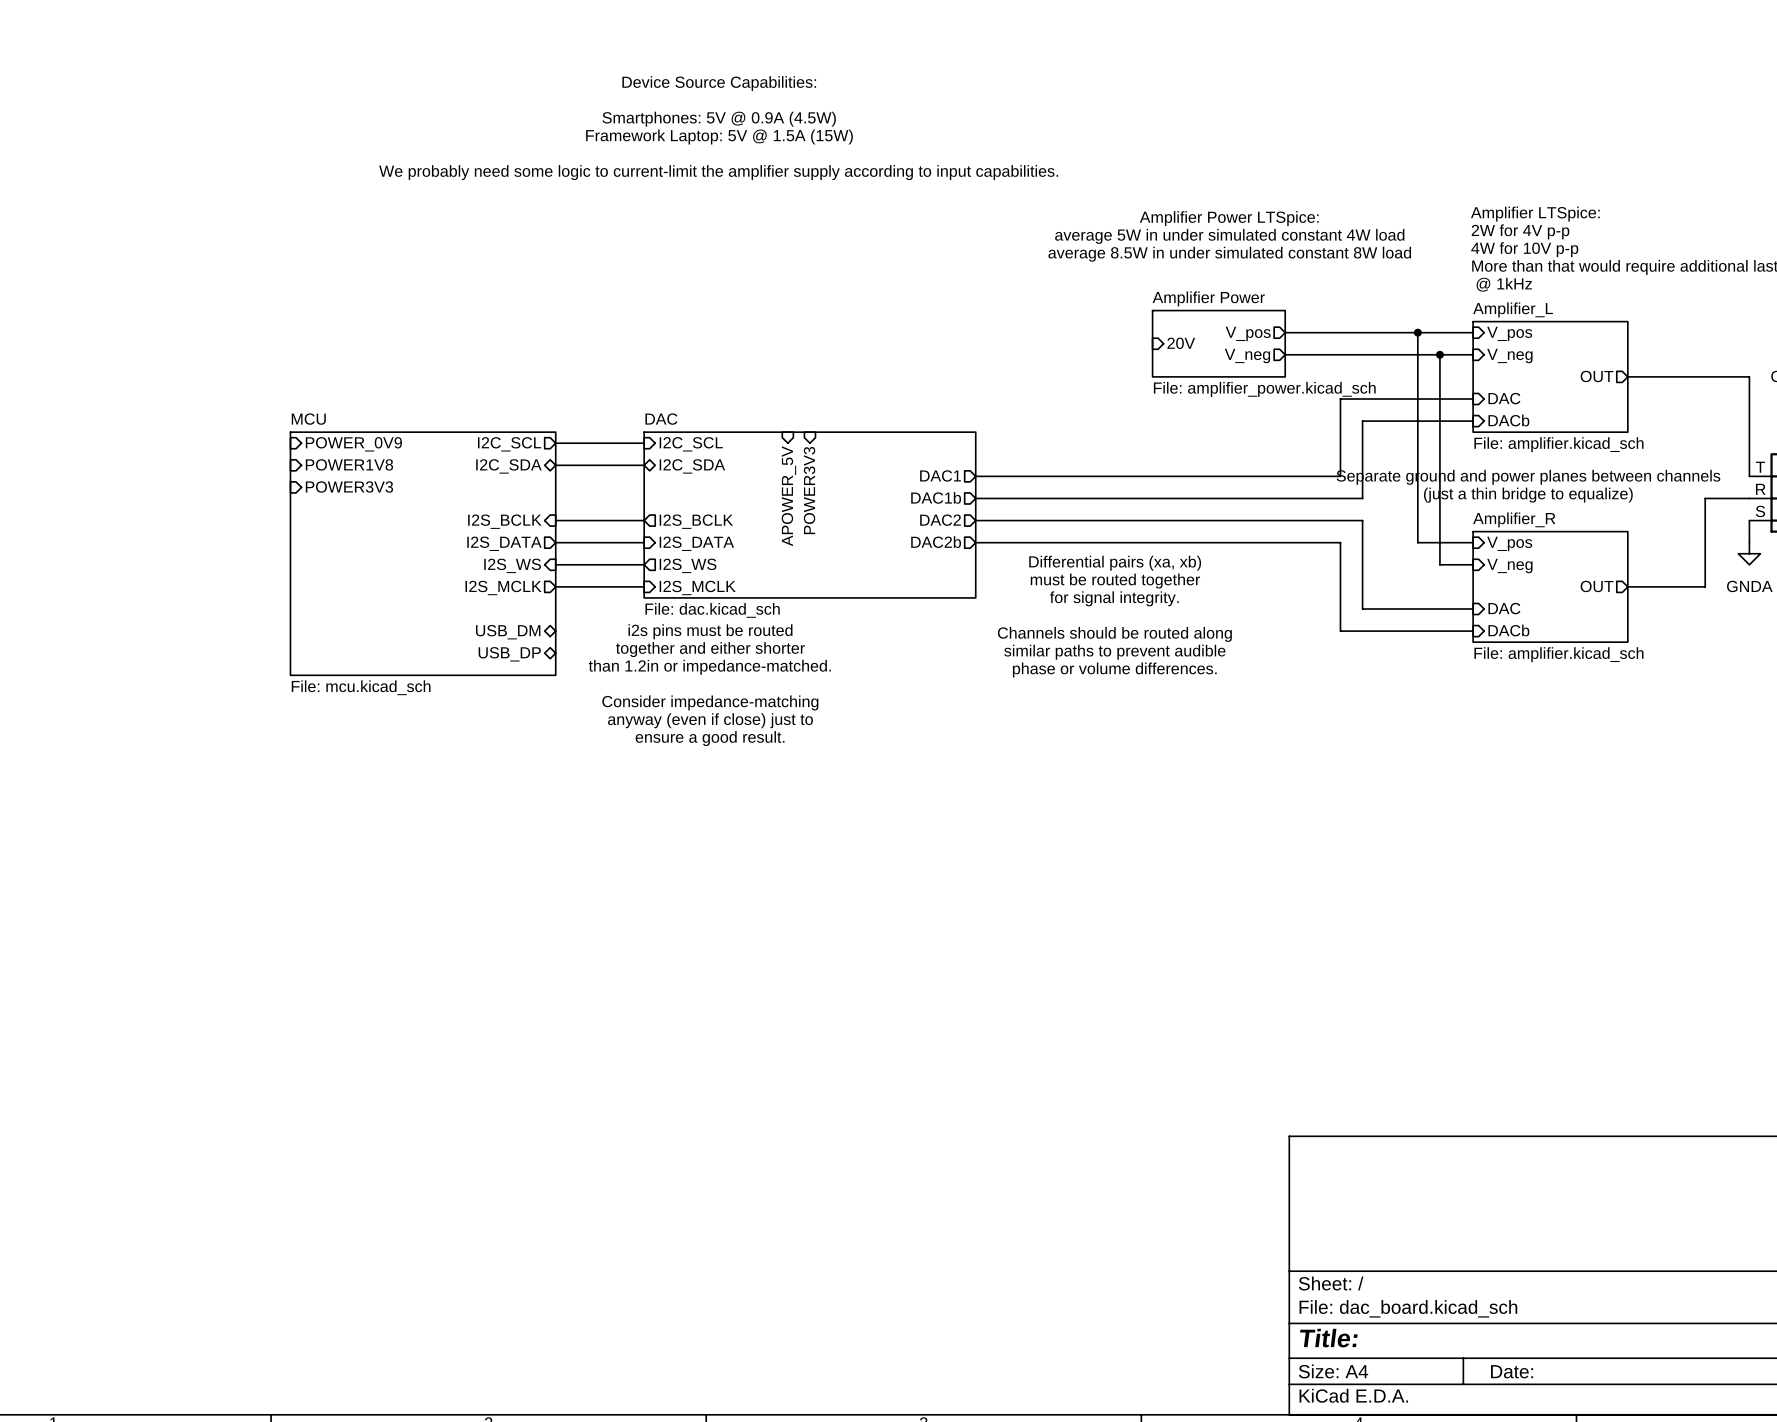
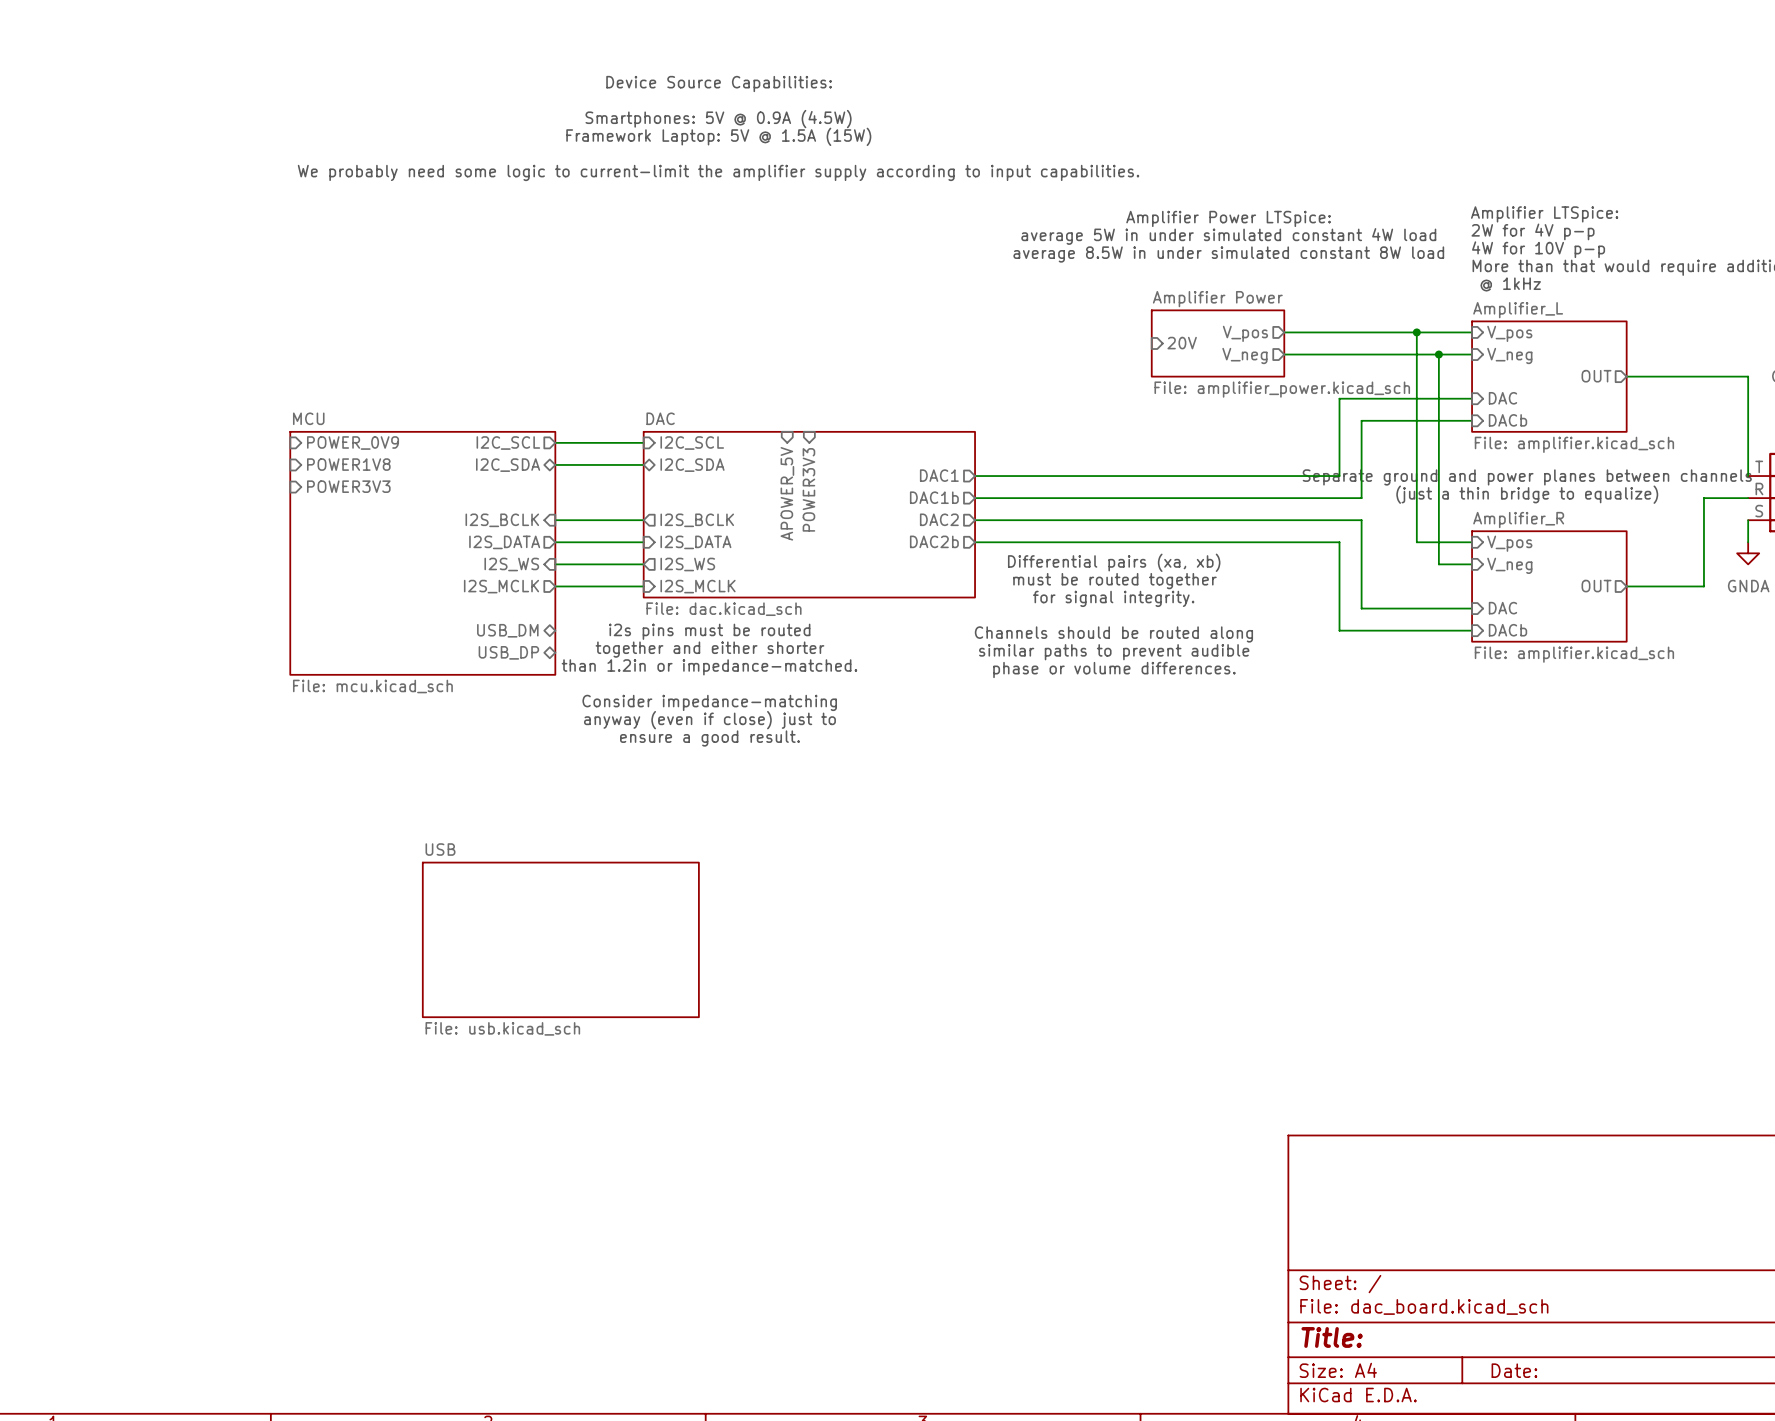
sheet USB: none -> File: usb.kicad_sch (560, 939)

